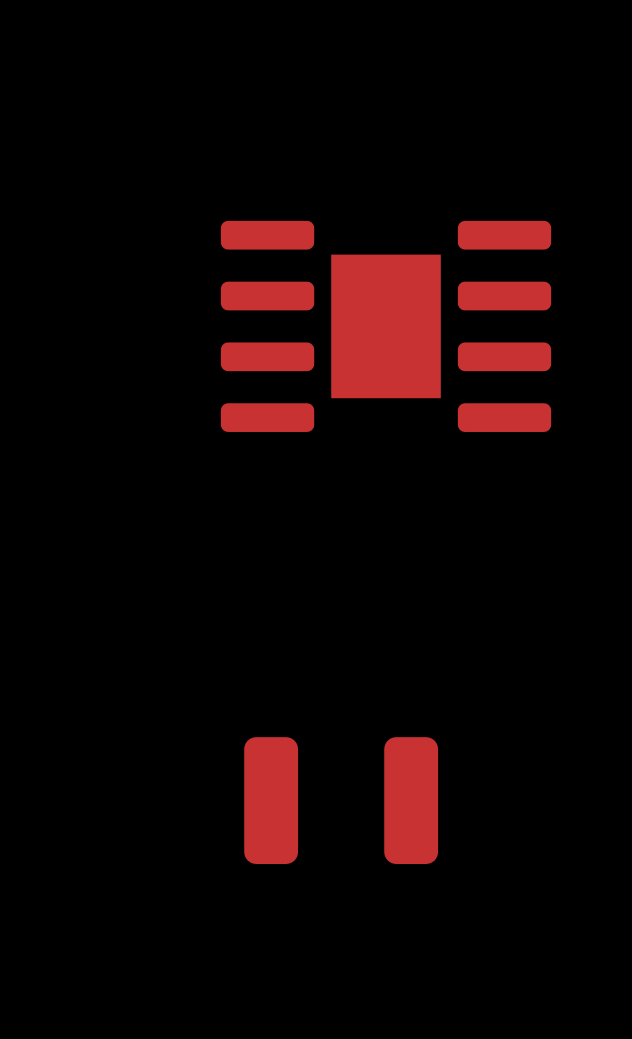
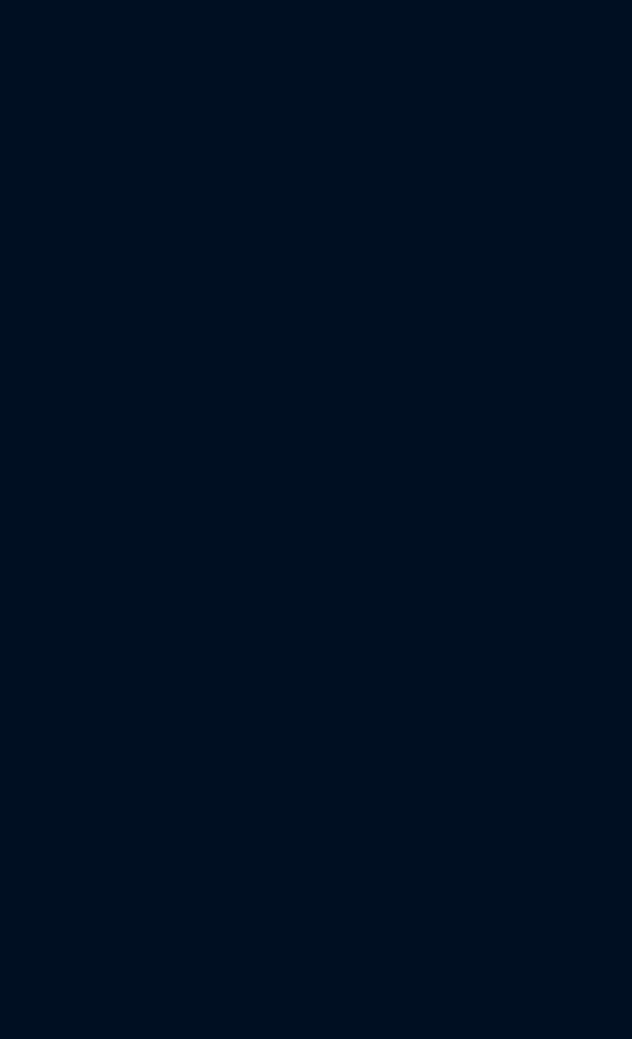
part: (386, 326) -> none
part: (341, 800) -> none

